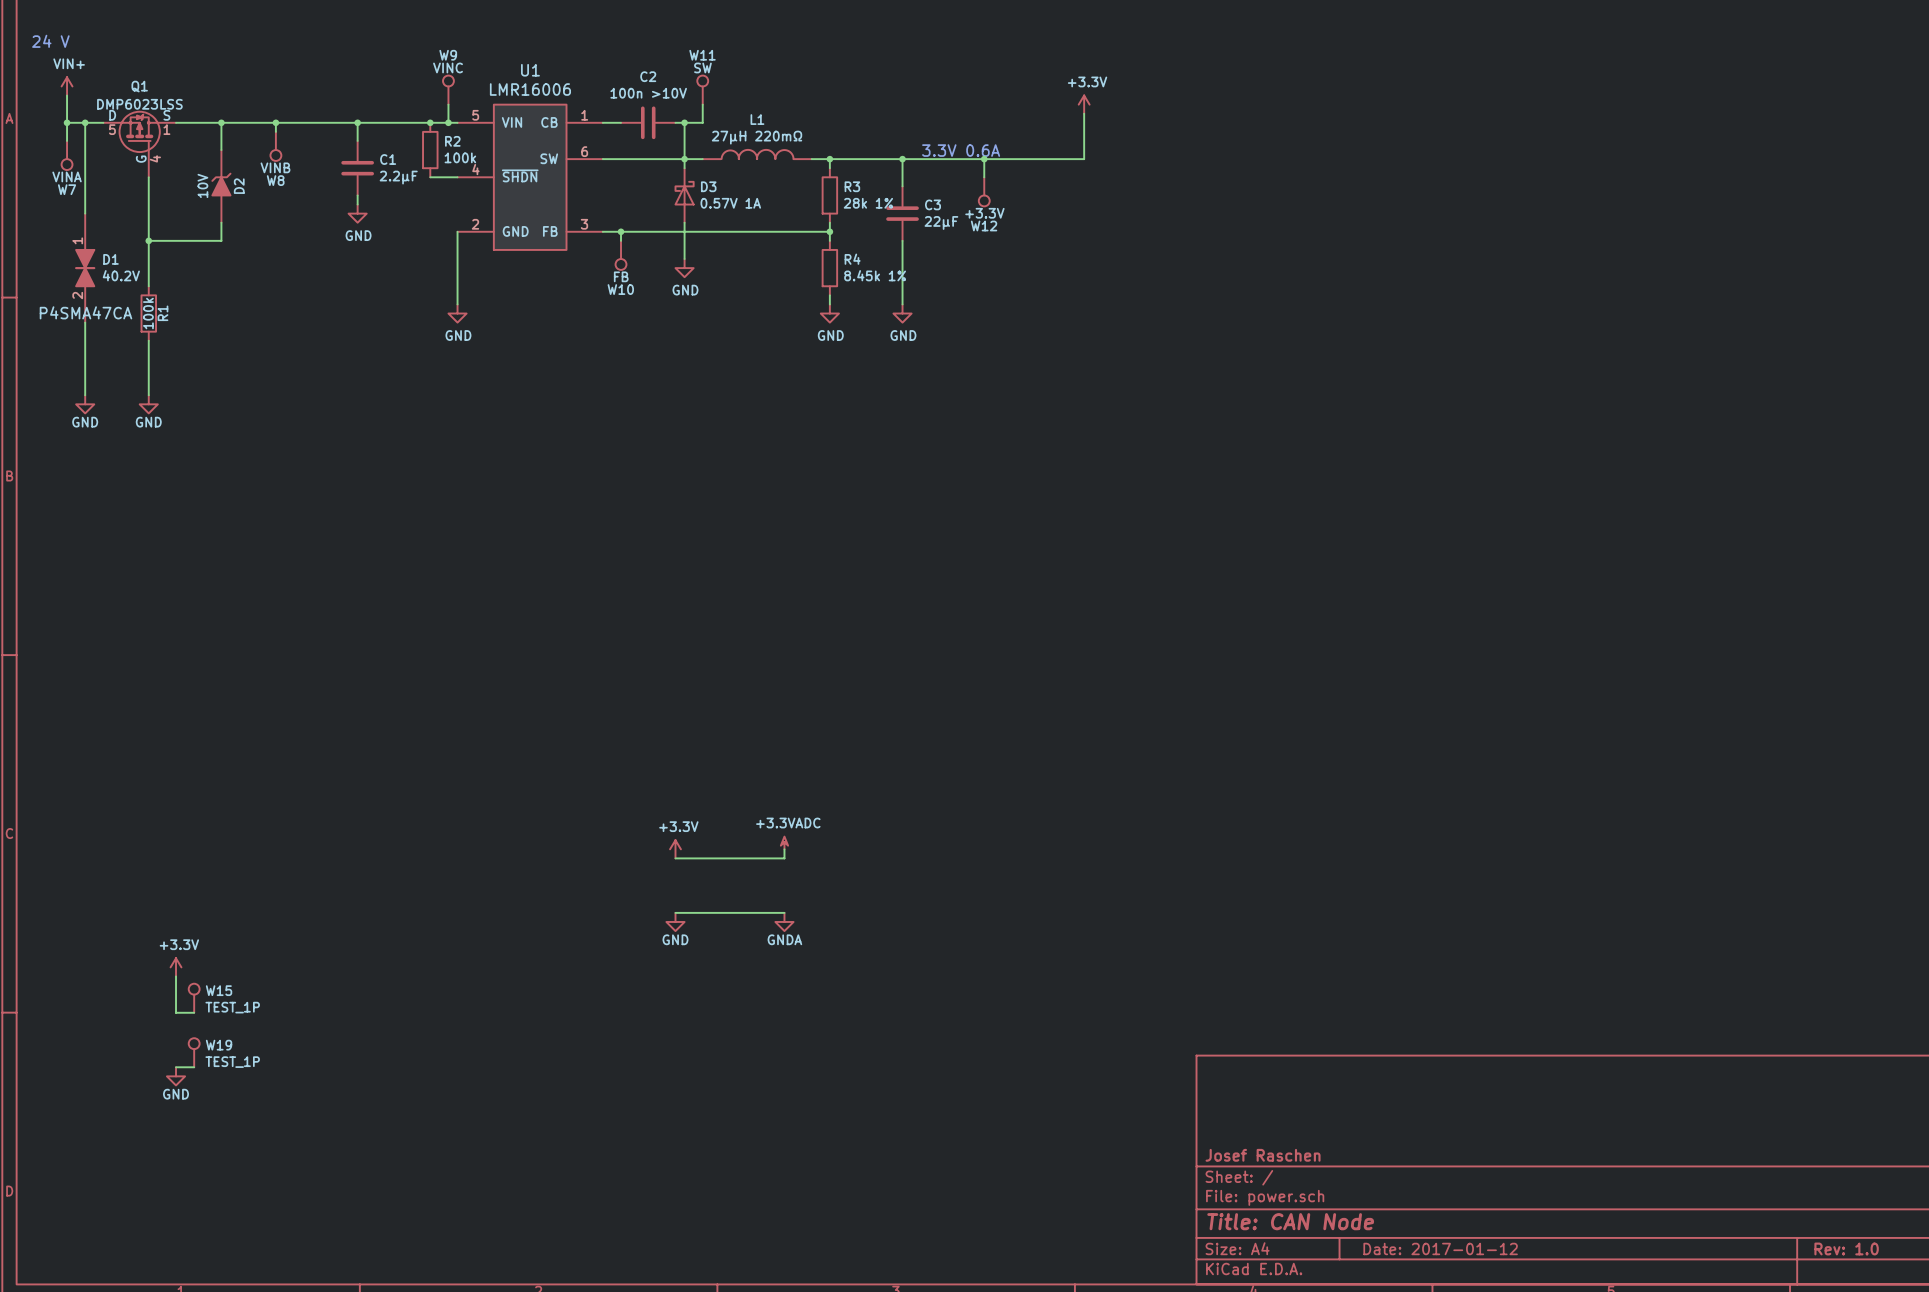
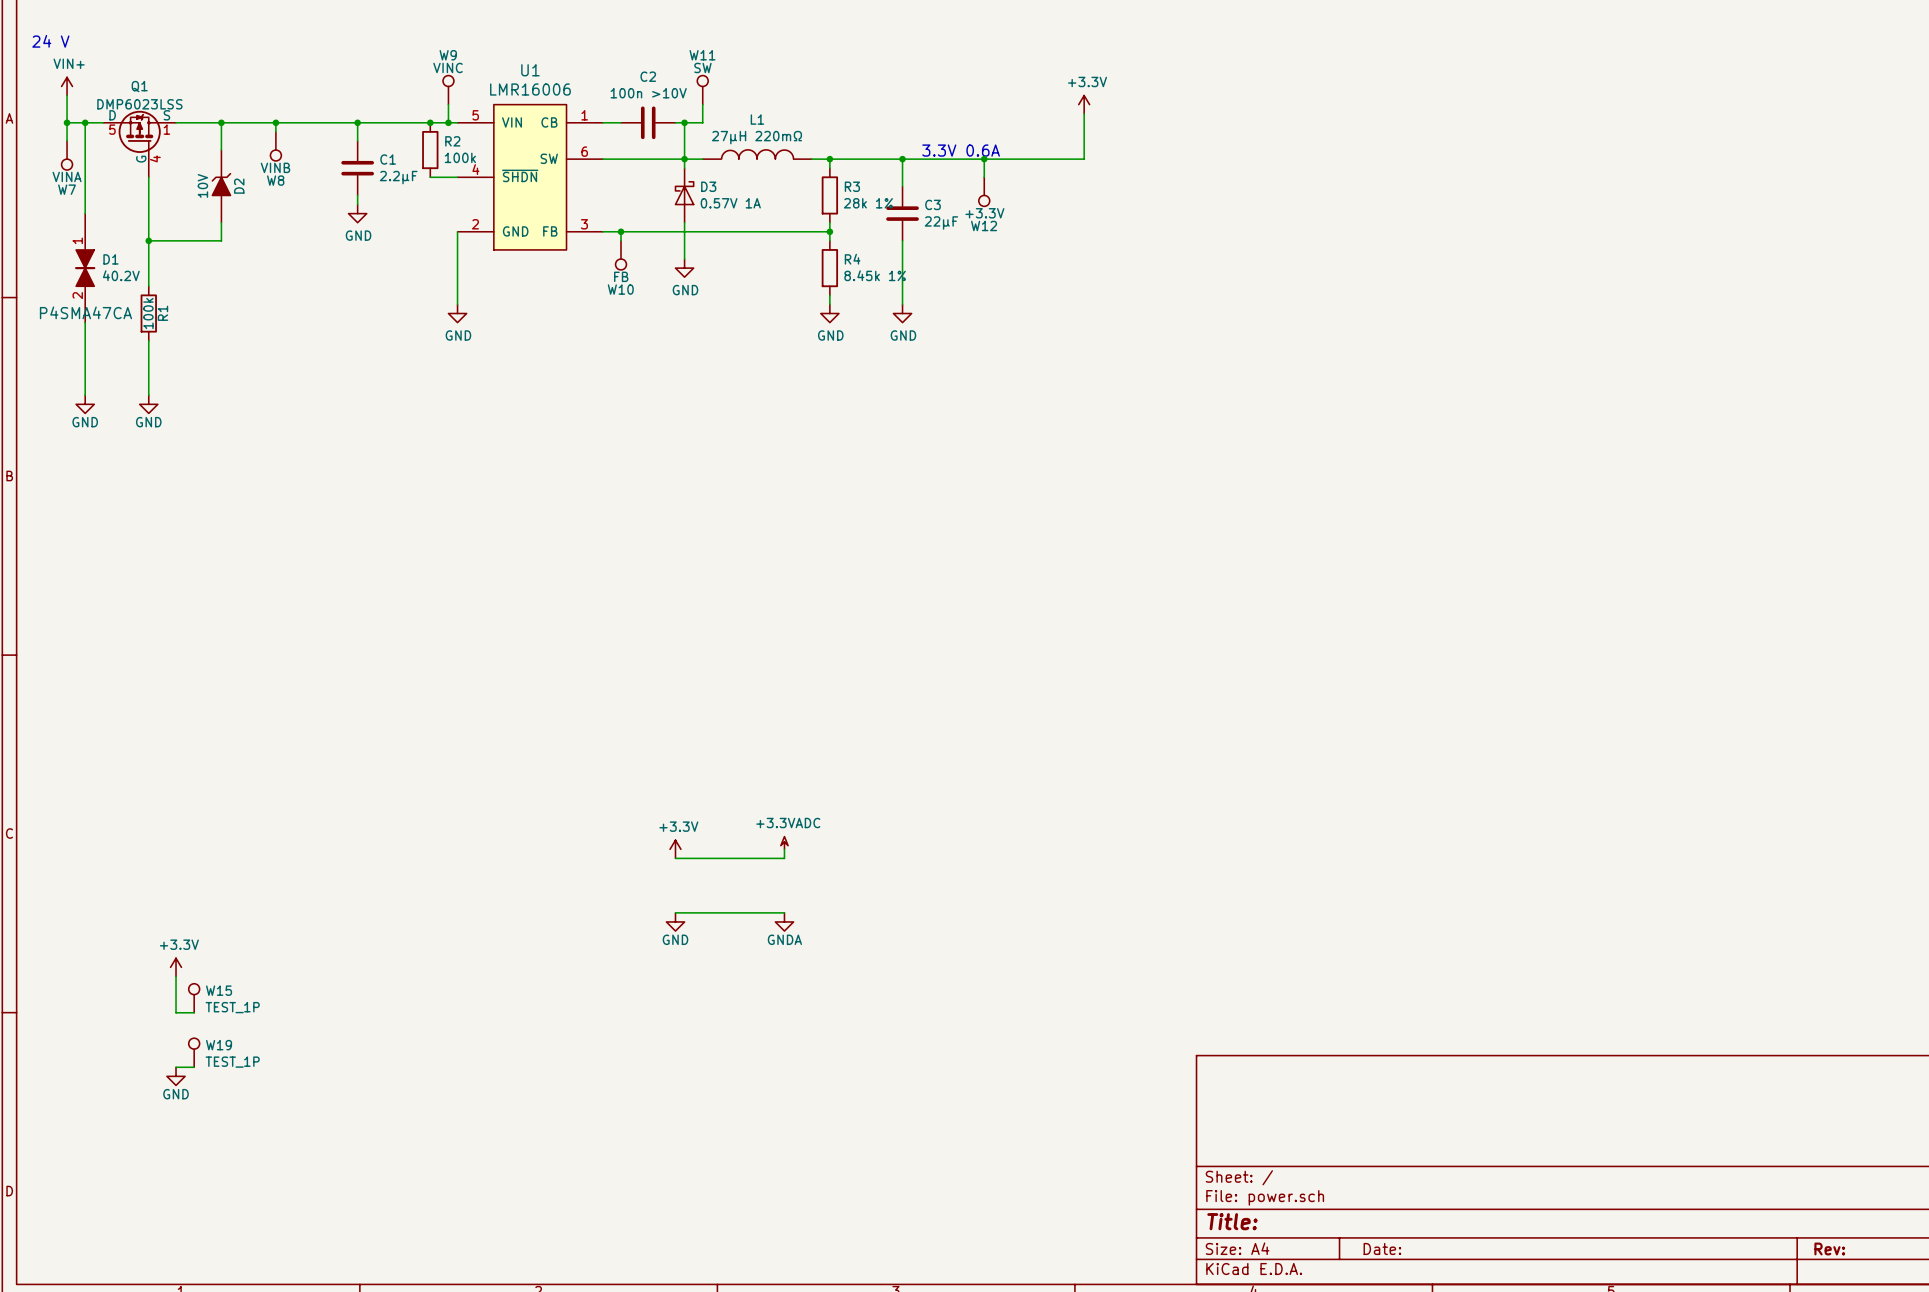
title block: Josef Raschen (1263, 1155) -> none
title block: Title: CAN Node (1290, 1221) -> Title: (1232, 1221)
title block: Date: 2017-01-12 (1440, 1248) -> Date: (1382, 1248)
title block: Rev: 1.0 (1846, 1248) -> Rev: (1829, 1248)

